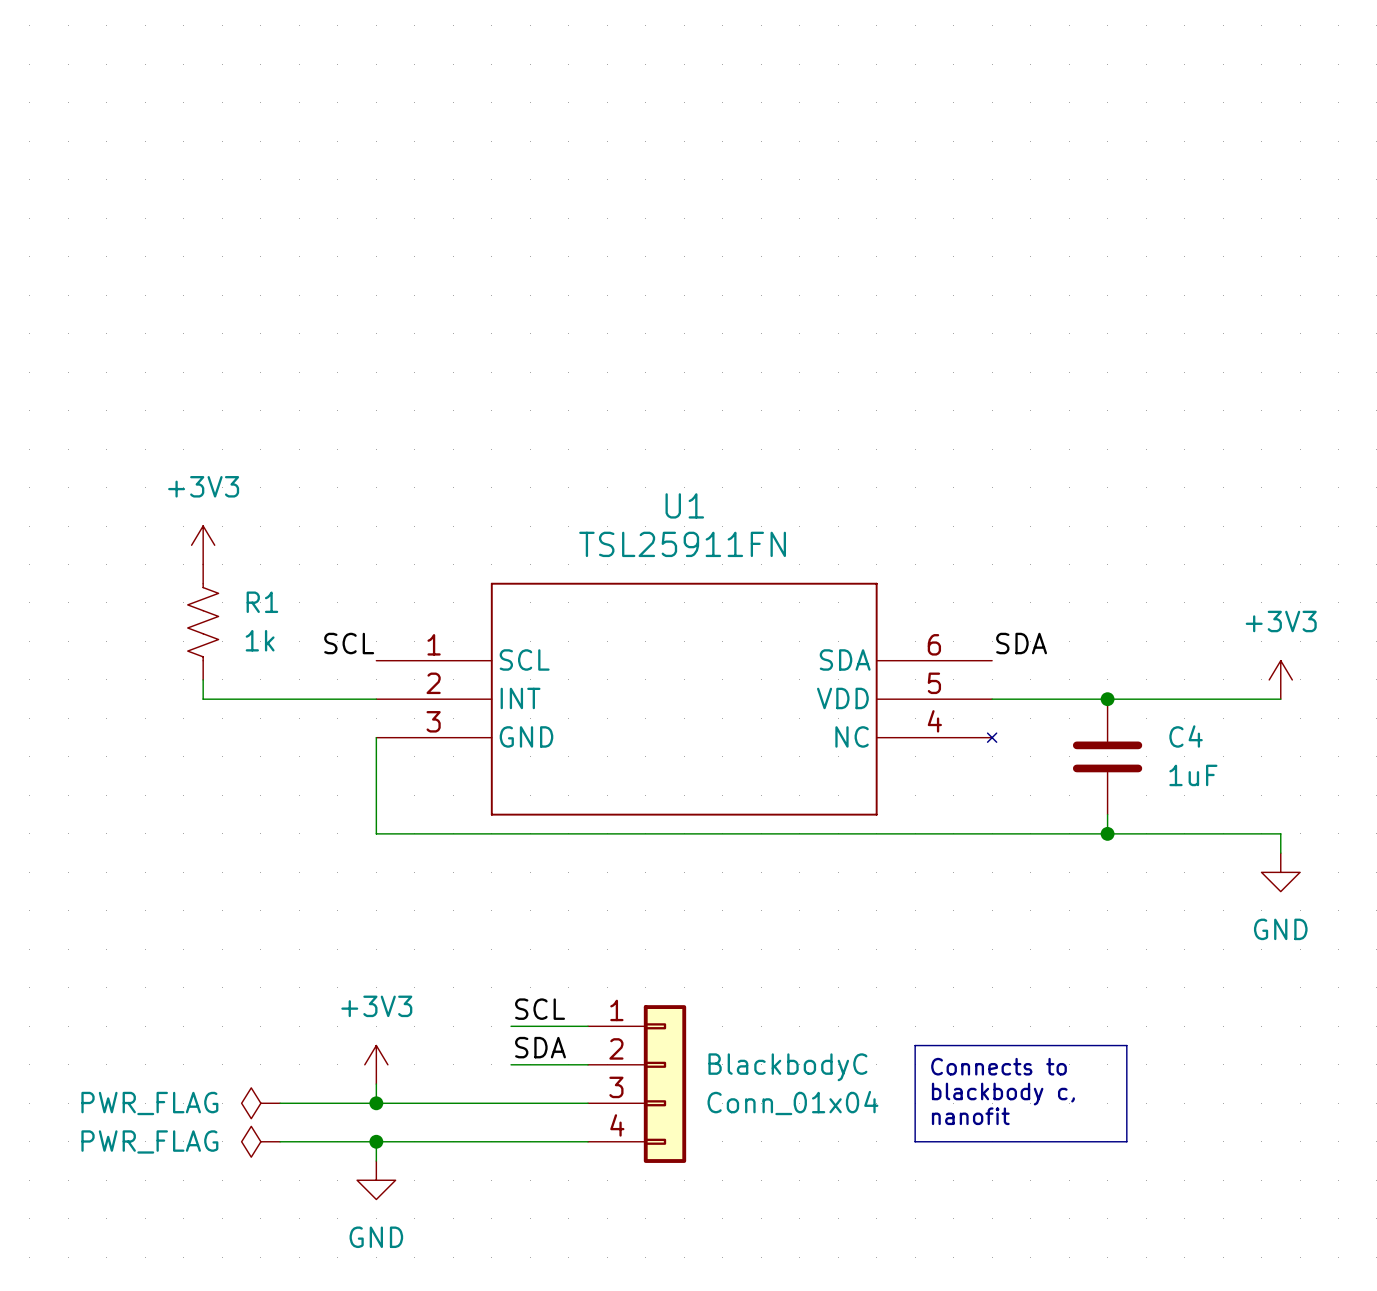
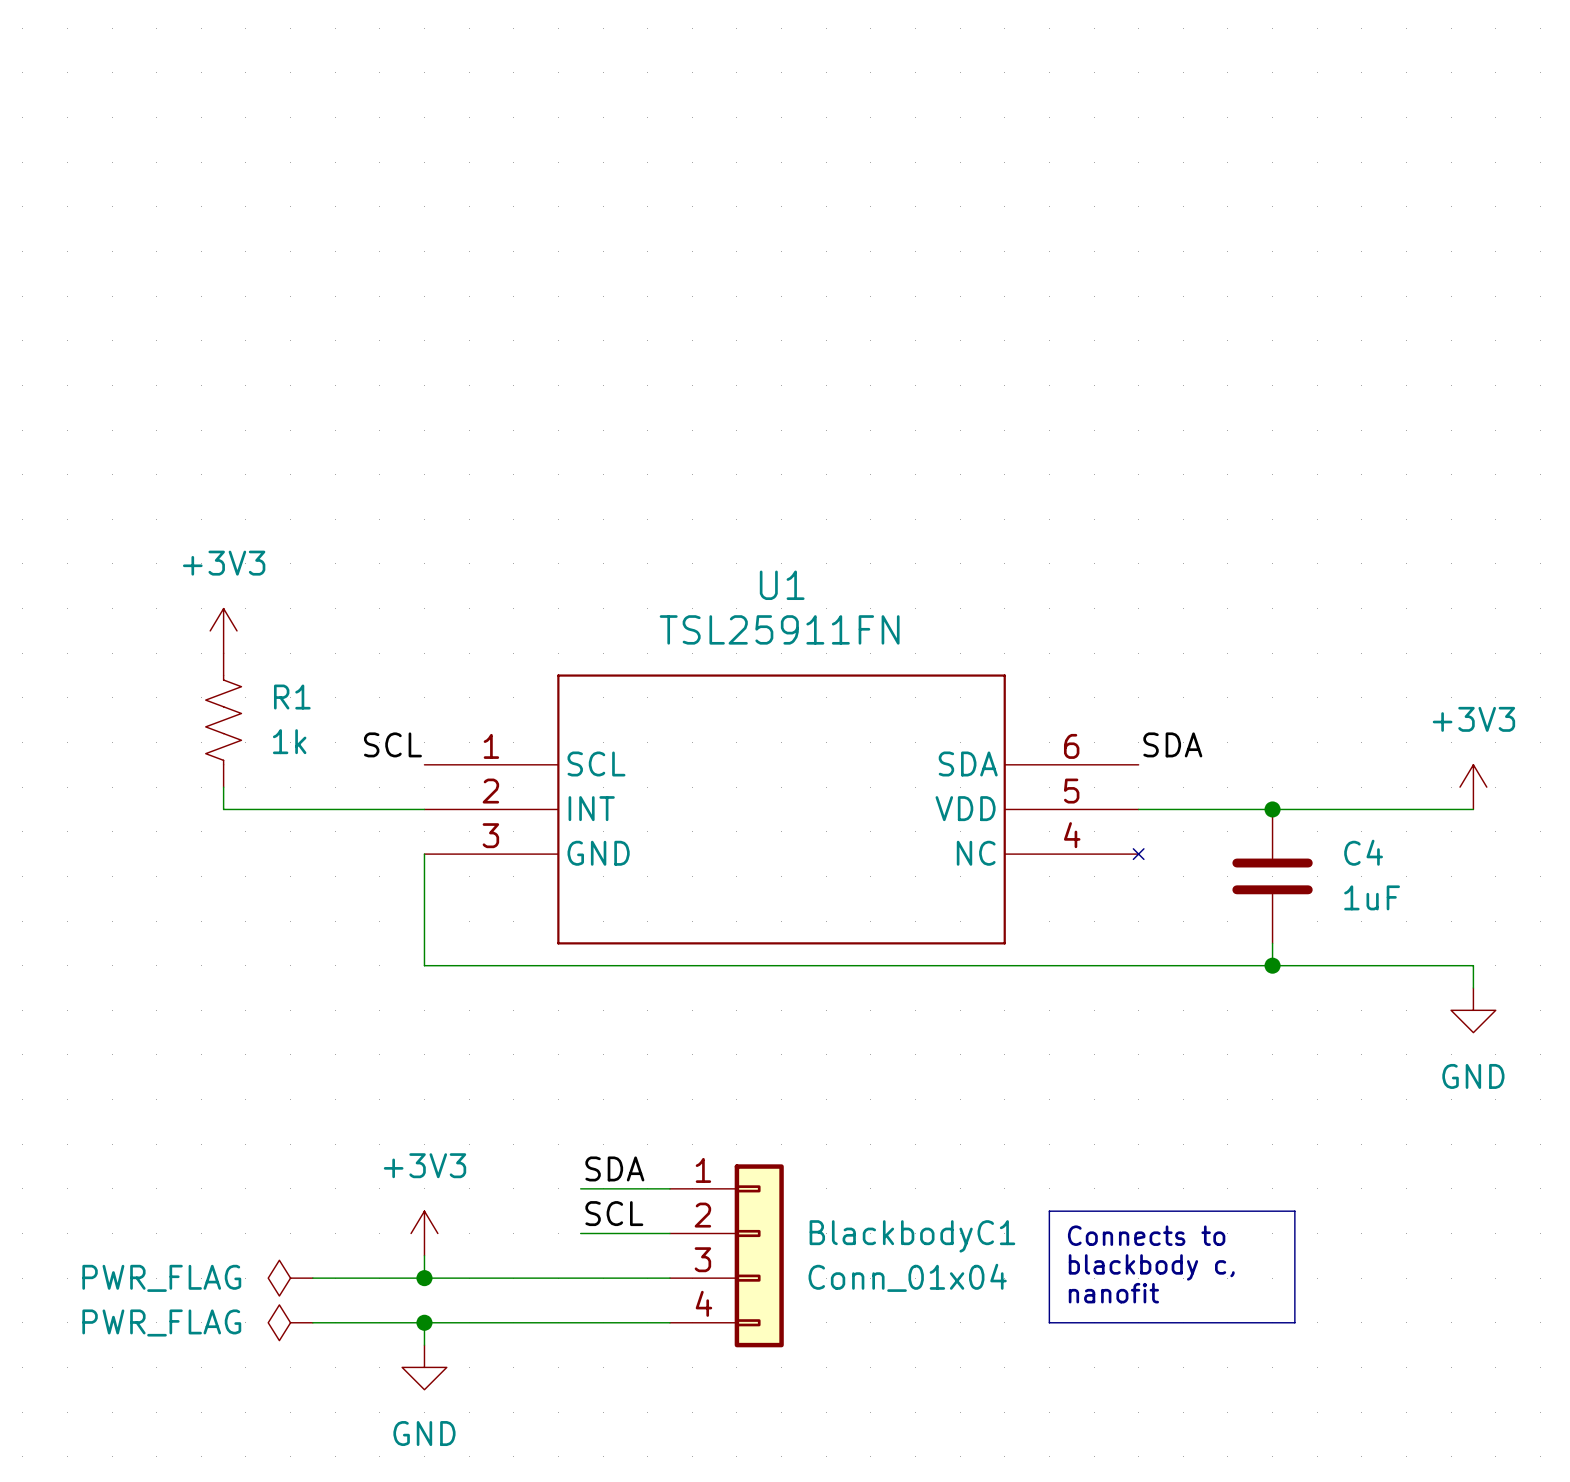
label: SCL (540, 1009) -> SDA (614, 1168)
label: SDA (540, 1047) -> SCL (614, 1213)
BlackbodyC name: BlackbodyC (787, 1067) -> BlackbodyC1 (912, 1236)

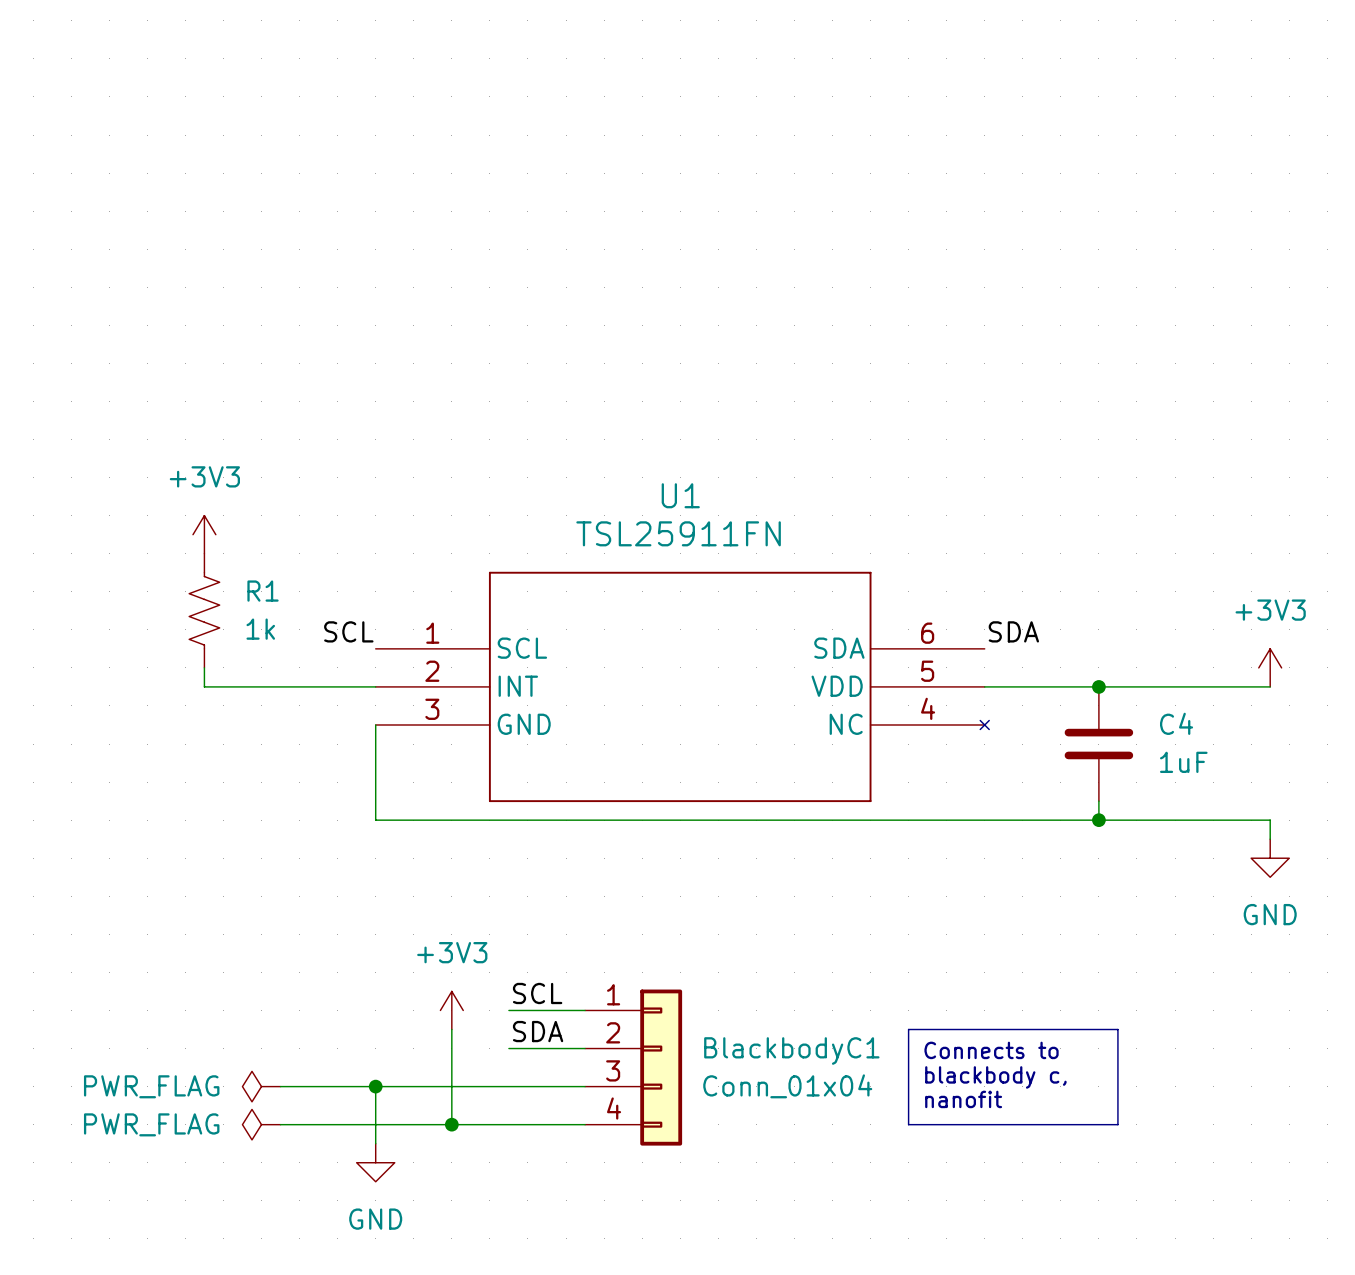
label: SDA (614, 1168) -> SCL (537, 993)
wire: none -> (451, 1029) (451, 1124)
label: SCL (614, 1213) -> SDA (538, 1031)
power symbol position: +3V3 (424, 1233) -> +3V3 (451, 1010)
wire: (424, 1255) (424, 1278) -> (375, 1124) (375, 1086)
junction position: (424, 1322) -> (451, 1124)

